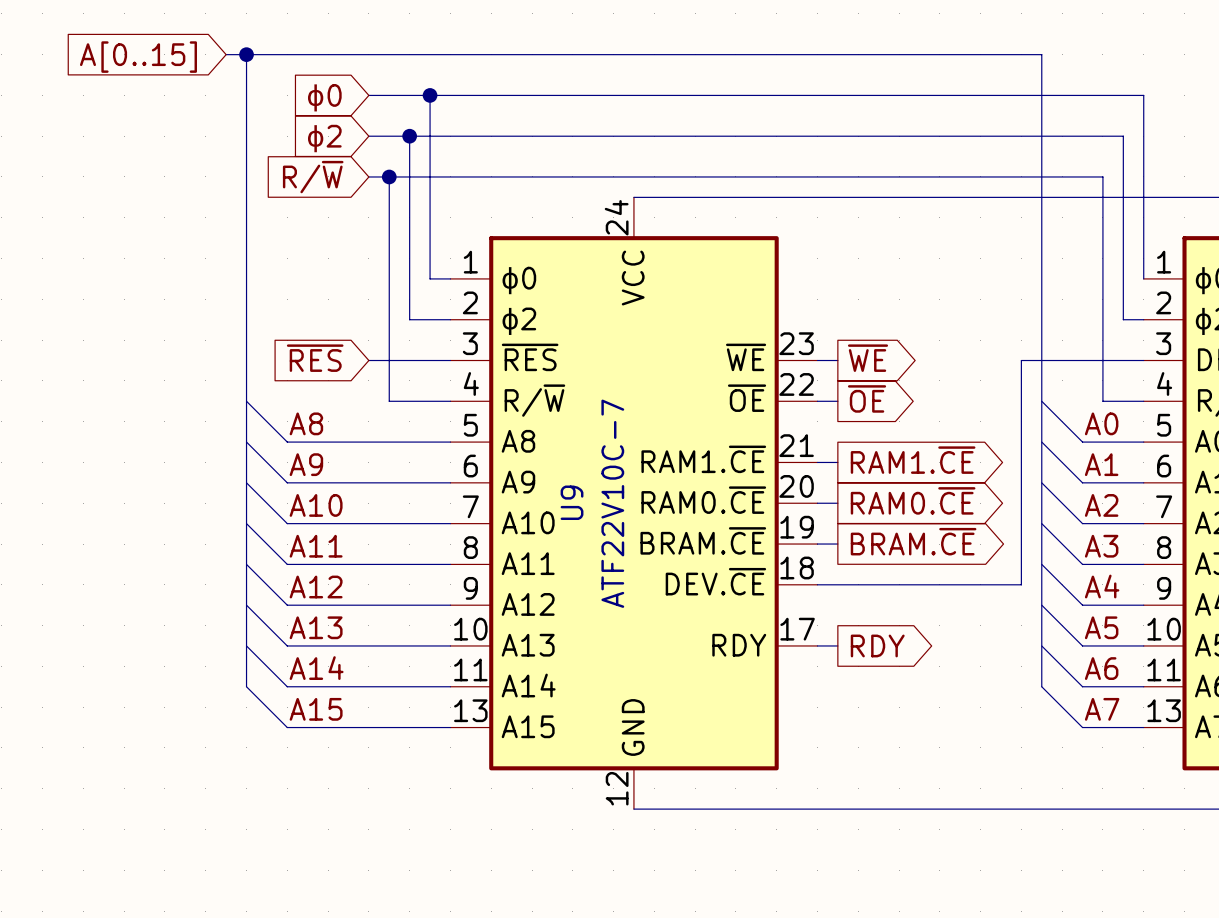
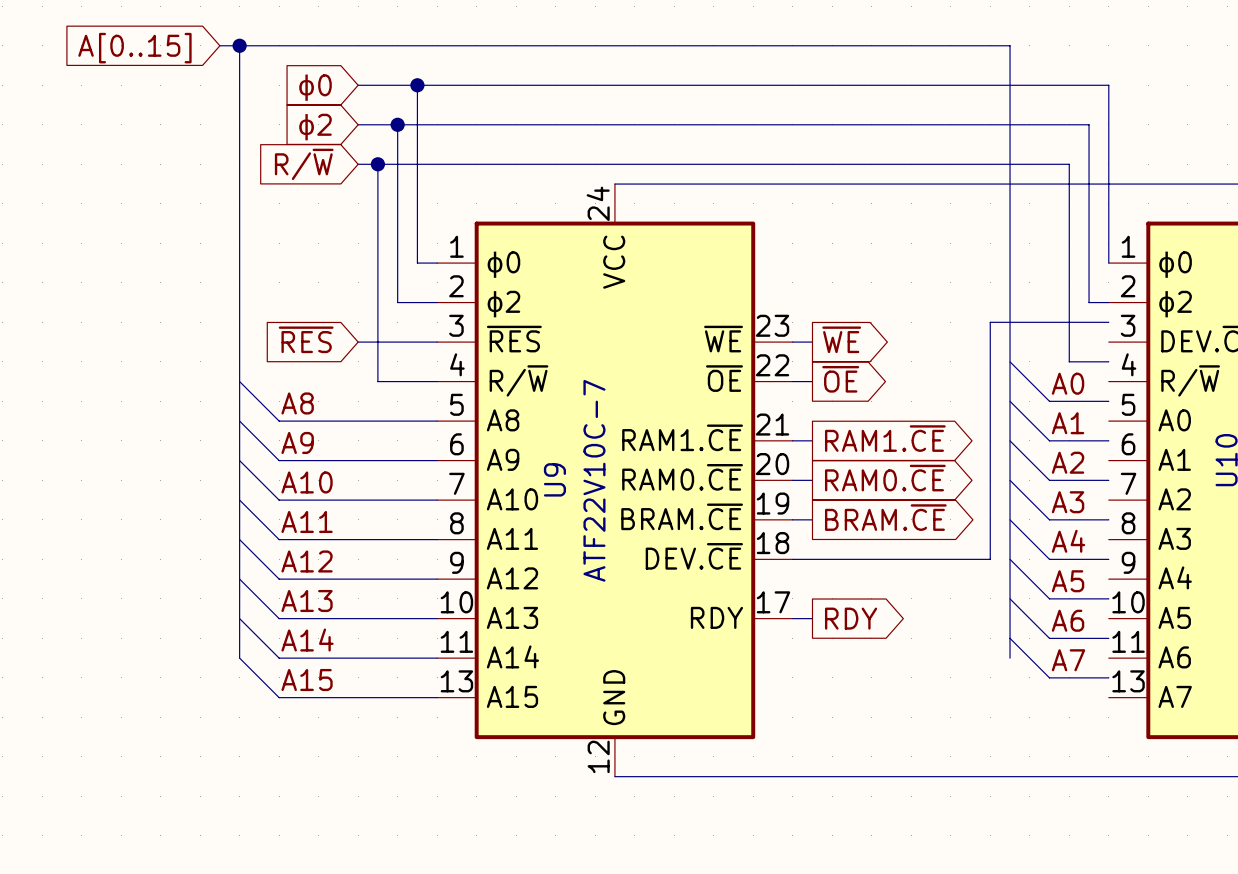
wire: (1021, 360) (1143, 360) -> (990, 342) (990, 322) (1108, 322)
wire: (1102, 380) (1102, 401) (1143, 401) -> (1069, 361) (1108, 361)
wire: (1041, 401) (1082, 442) (1143, 442) -> (1010, 361) (1049, 401) (1108, 401)
label position: A0 (1101, 423) -> A0 (1068, 383)
wire: (1041, 442) (1082, 482) (1143, 482) -> (1010, 401) (1049, 440) (1108, 440)
label position: A1 (1101, 464) -> A1 (1068, 423)
wire: (1041, 482) (1082, 523) (1143, 523) -> (1010, 440) (1049, 480) (1108, 480)
label position: A2 (1101, 505) -> A2 (1068, 462)
wire: (1041, 523) (1082, 564) (1143, 564) -> (1010, 480) (1049, 519) (1108, 519)
label position: A3 (1101, 546) -> A3 (1068, 502)
wire: (1041, 564) (1082, 605) (1143, 605) -> (1010, 519) (1049, 559) (1108, 559)
label position: A4 (1102, 586) -> A4 (1068, 541)
wire: (1041, 605) (1082, 645) (1143, 645) -> (1010, 559) (1049, 598) (1108, 598)
label position: A5 (1101, 627) -> A5 (1068, 581)
wire: (1041, 645) (1082, 686) (1143, 686) -> (1010, 598) (1049, 638) (1108, 638)
label position: A6 (1101, 668) -> A6 (1068, 620)
wire: (1041, 686) (1082, 727) (1143, 727) -> (1010, 638) (1049, 677) (1108, 677)
label position: A7 (1102, 709) -> A7 (1068, 660)

